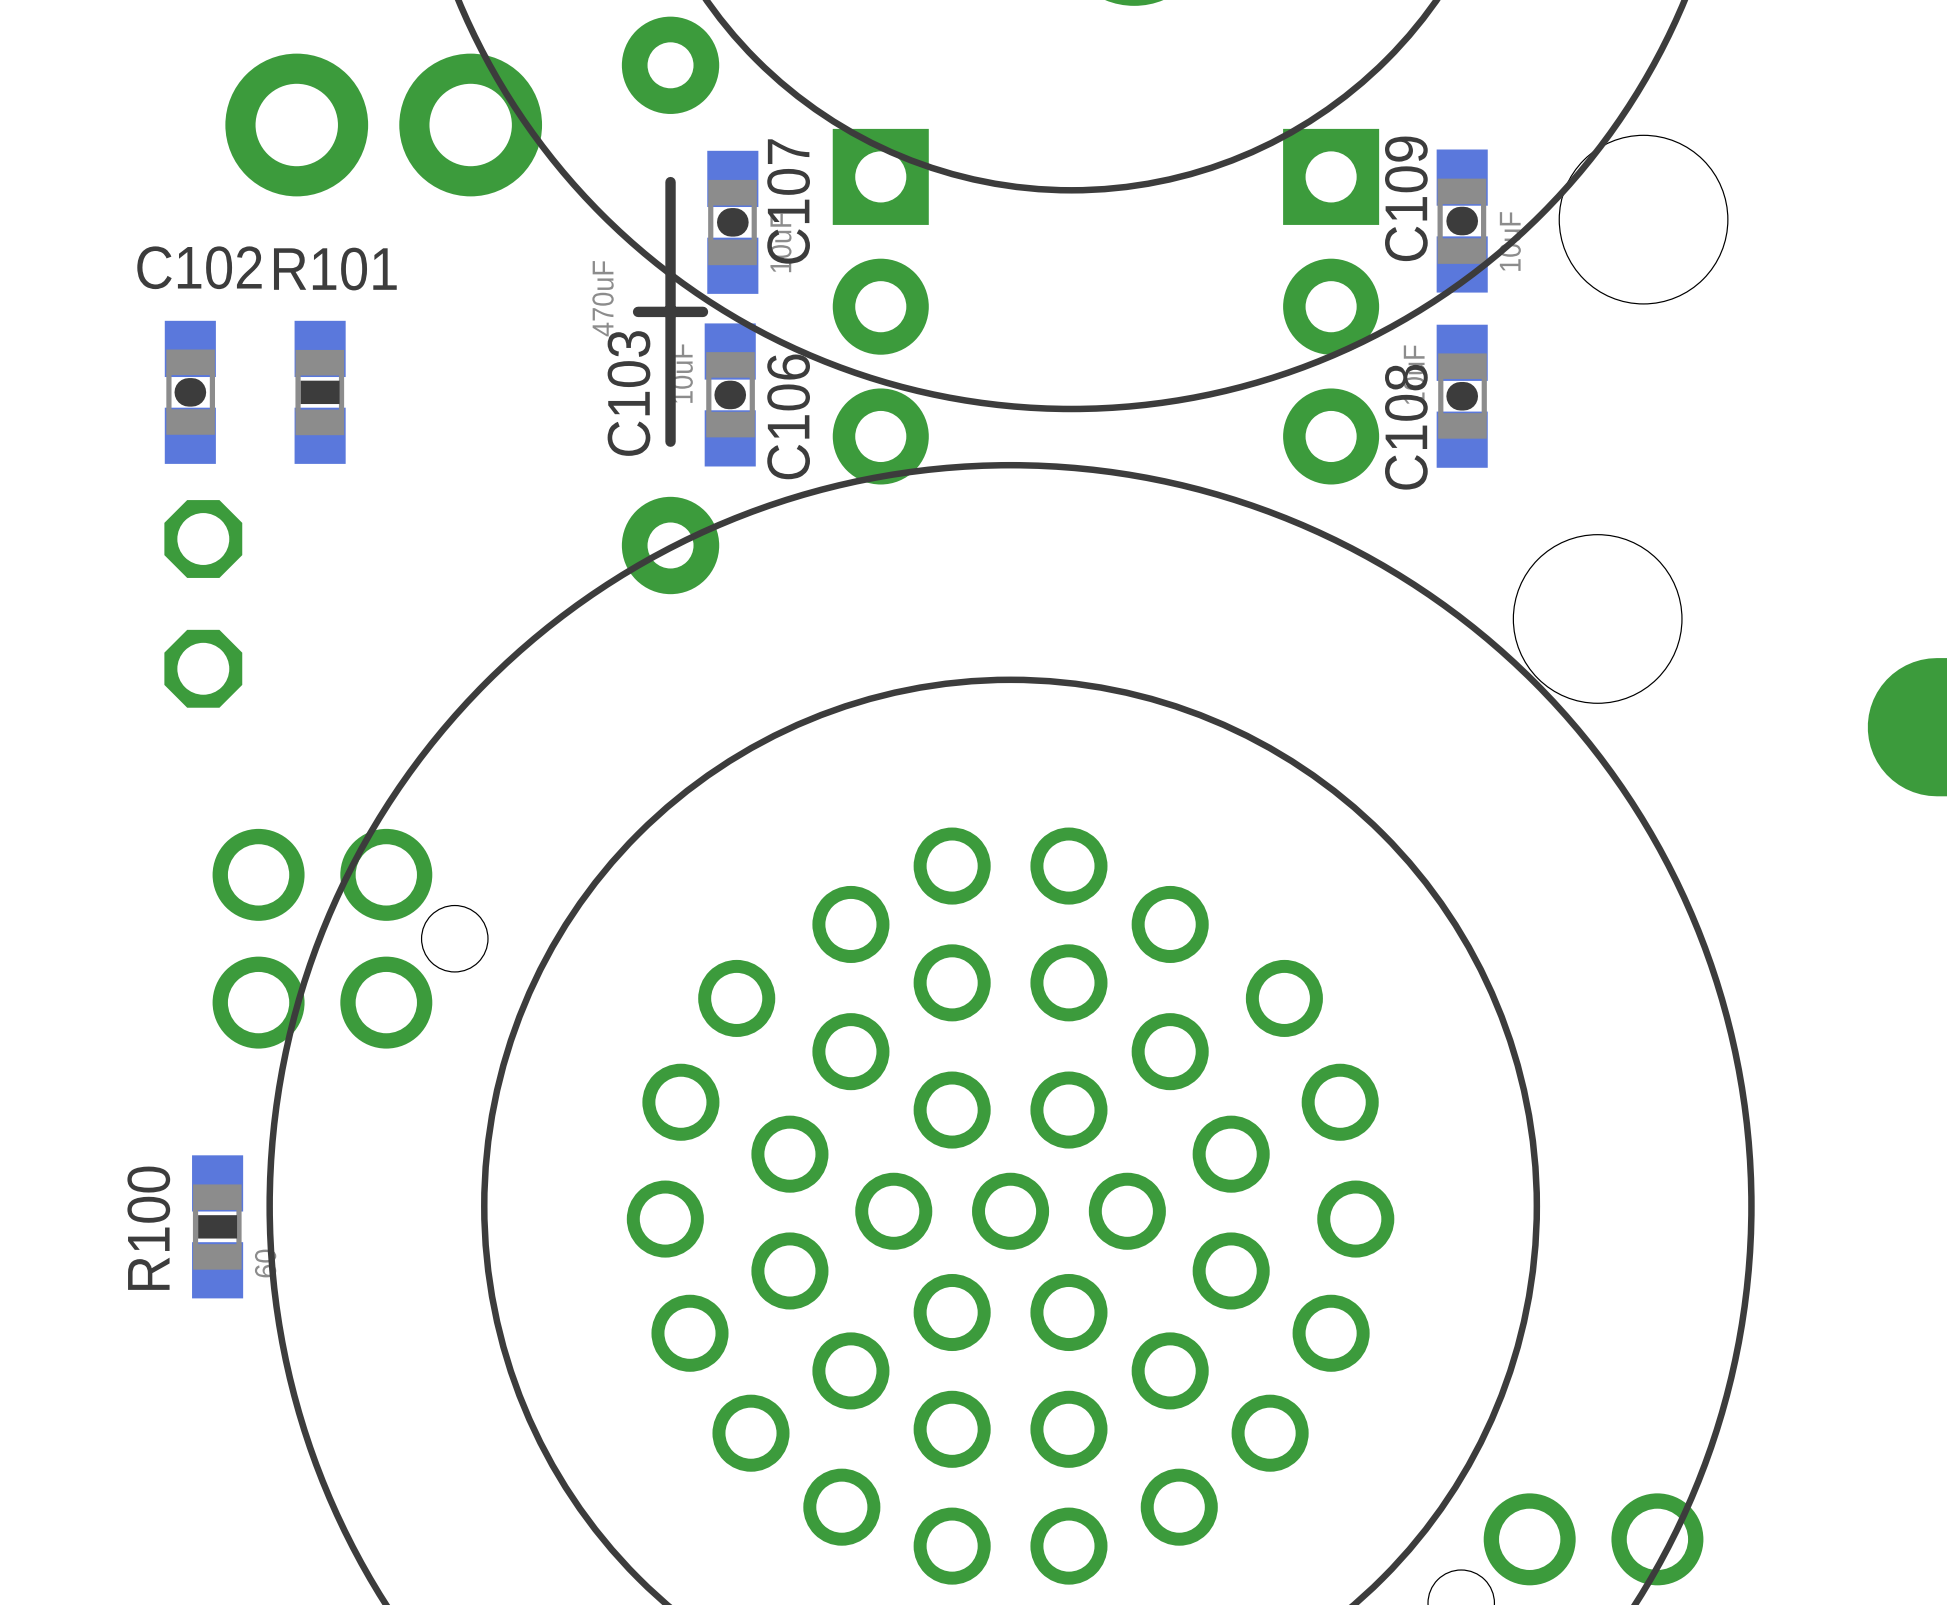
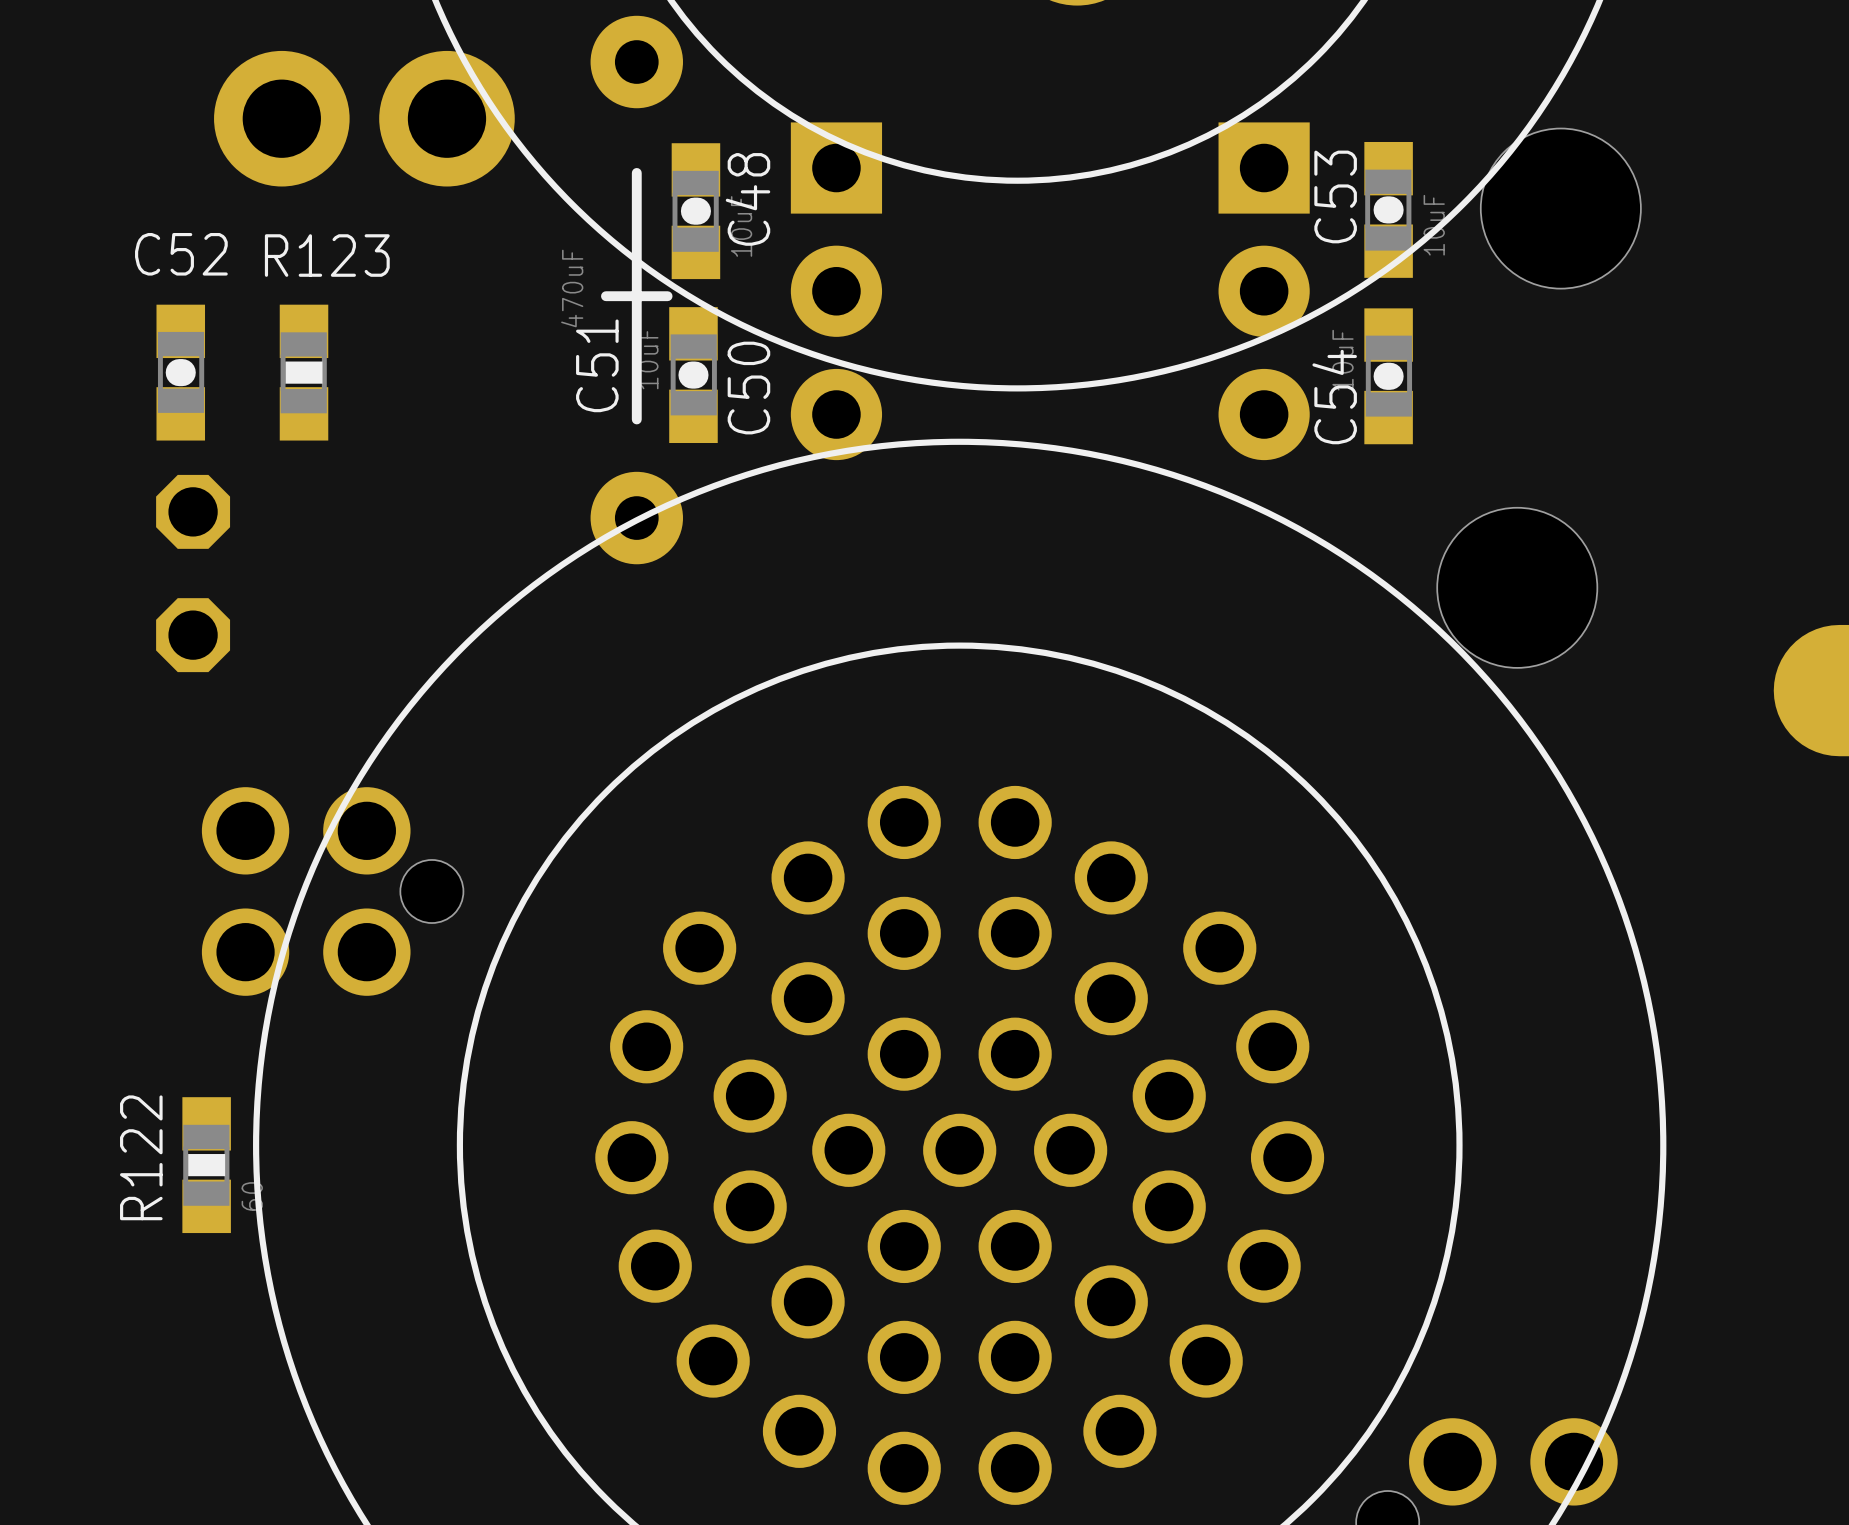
C109 name: C109 (1406, 198) -> C53 (1335, 196)
C107 name: C107 (788, 201) -> C48 (748, 199)
C102 name: C102 (199, 267) -> C52 (181, 254)
R101 name: R101 (335, 269) -> R123 (327, 255)
C103 name: C103 (628, 393) -> C51 (597, 365)
C106 name: C106 (788, 416) -> C50 (748, 388)
C108 name: C108 (1406, 427) -> C54 (1334, 397)
R100 name: R100 (148, 1228) -> R122 (141, 1157)

